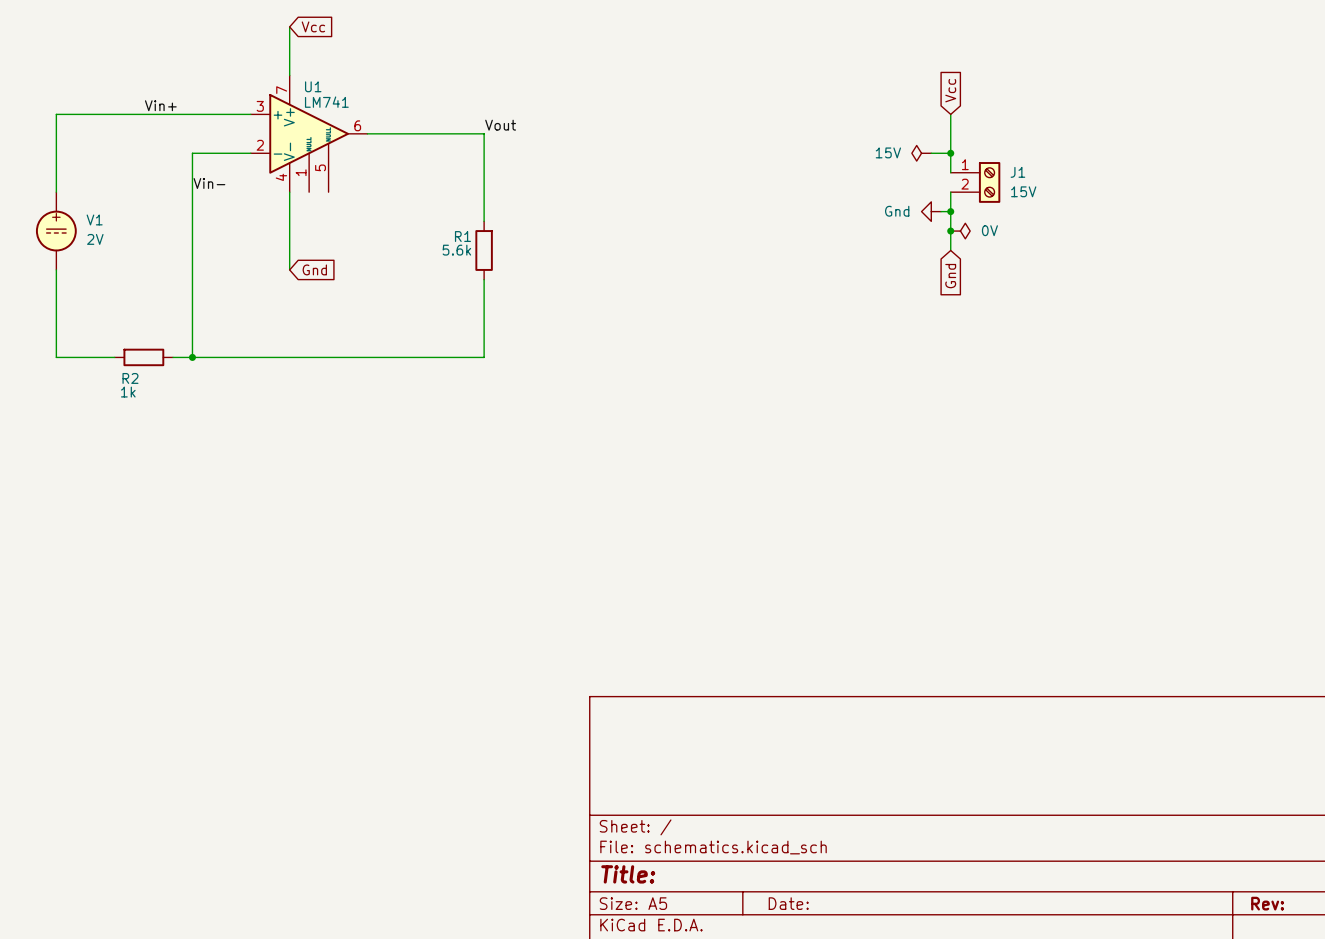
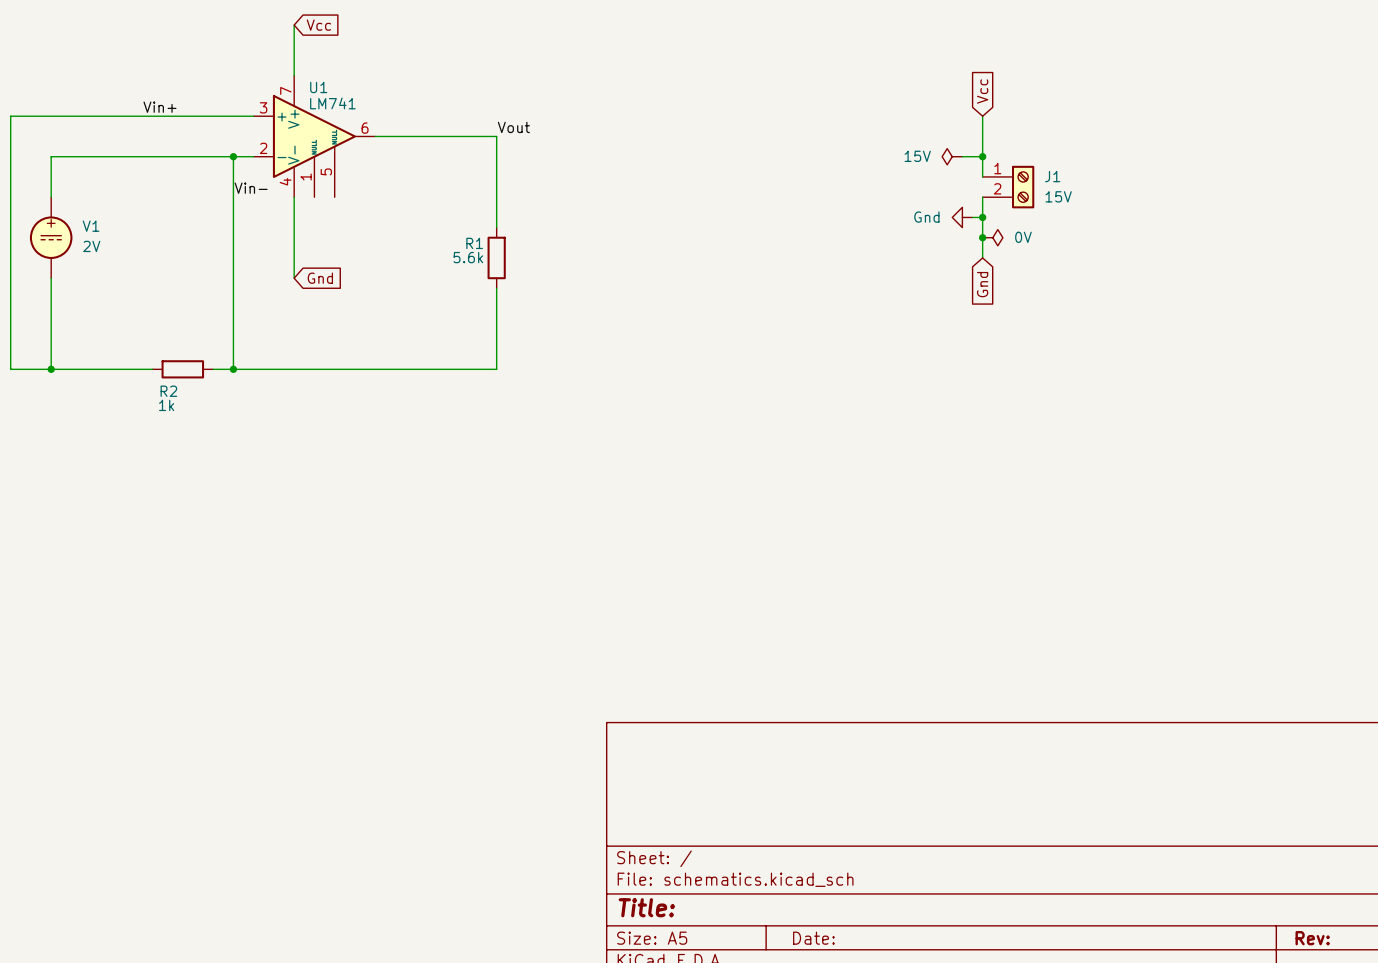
wire: (56, 114) (56, 153) -> (192, 156) (51, 156)
wire: none -> (51, 116) (10, 116) (10, 369) (51, 369)
wire: (192, 153) (192, 357) -> (233, 156) (233, 369)
junction: none -> (233, 156)
label position: Vin- (209, 183) -> Vin- (251, 188)
junction: none -> (51, 369)
R2 position: (143, 357) -> (182, 369)
wire: (173, 357) (211, 357) -> (111, 369) (152, 369)
junction position: (192, 357) -> (233, 369)

